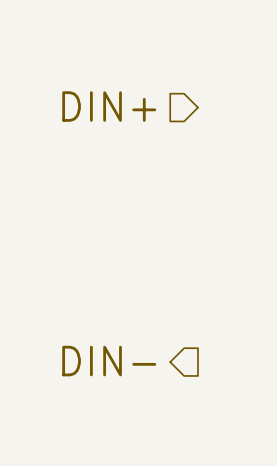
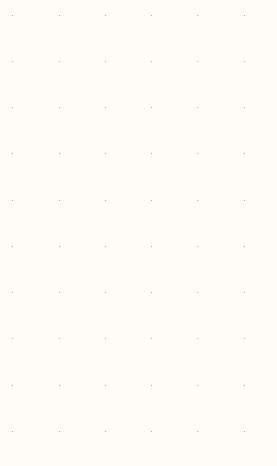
hierarchical label: DIN+ (109, 106) -> none
hierarchical label: DIN- (109, 361) -> none

